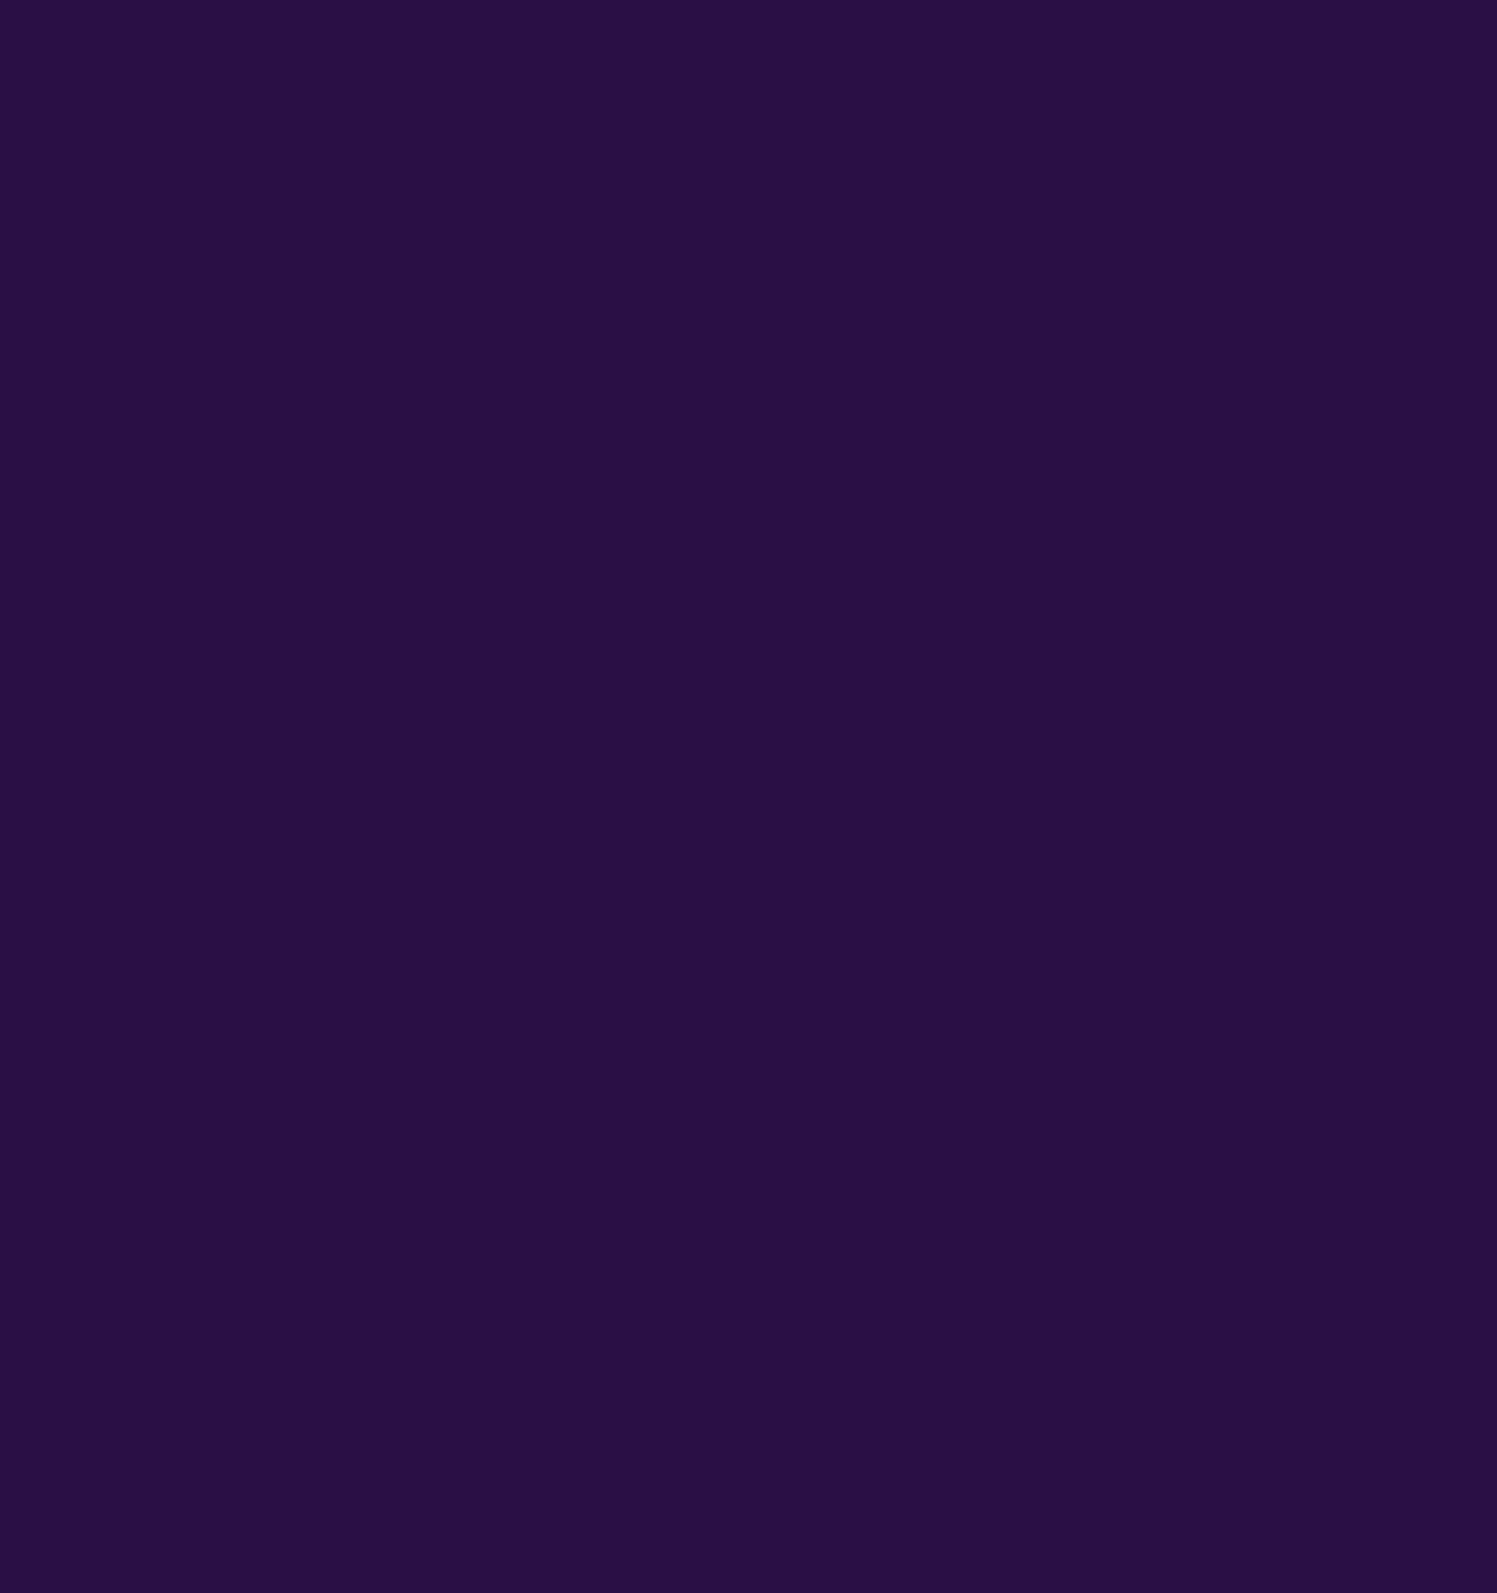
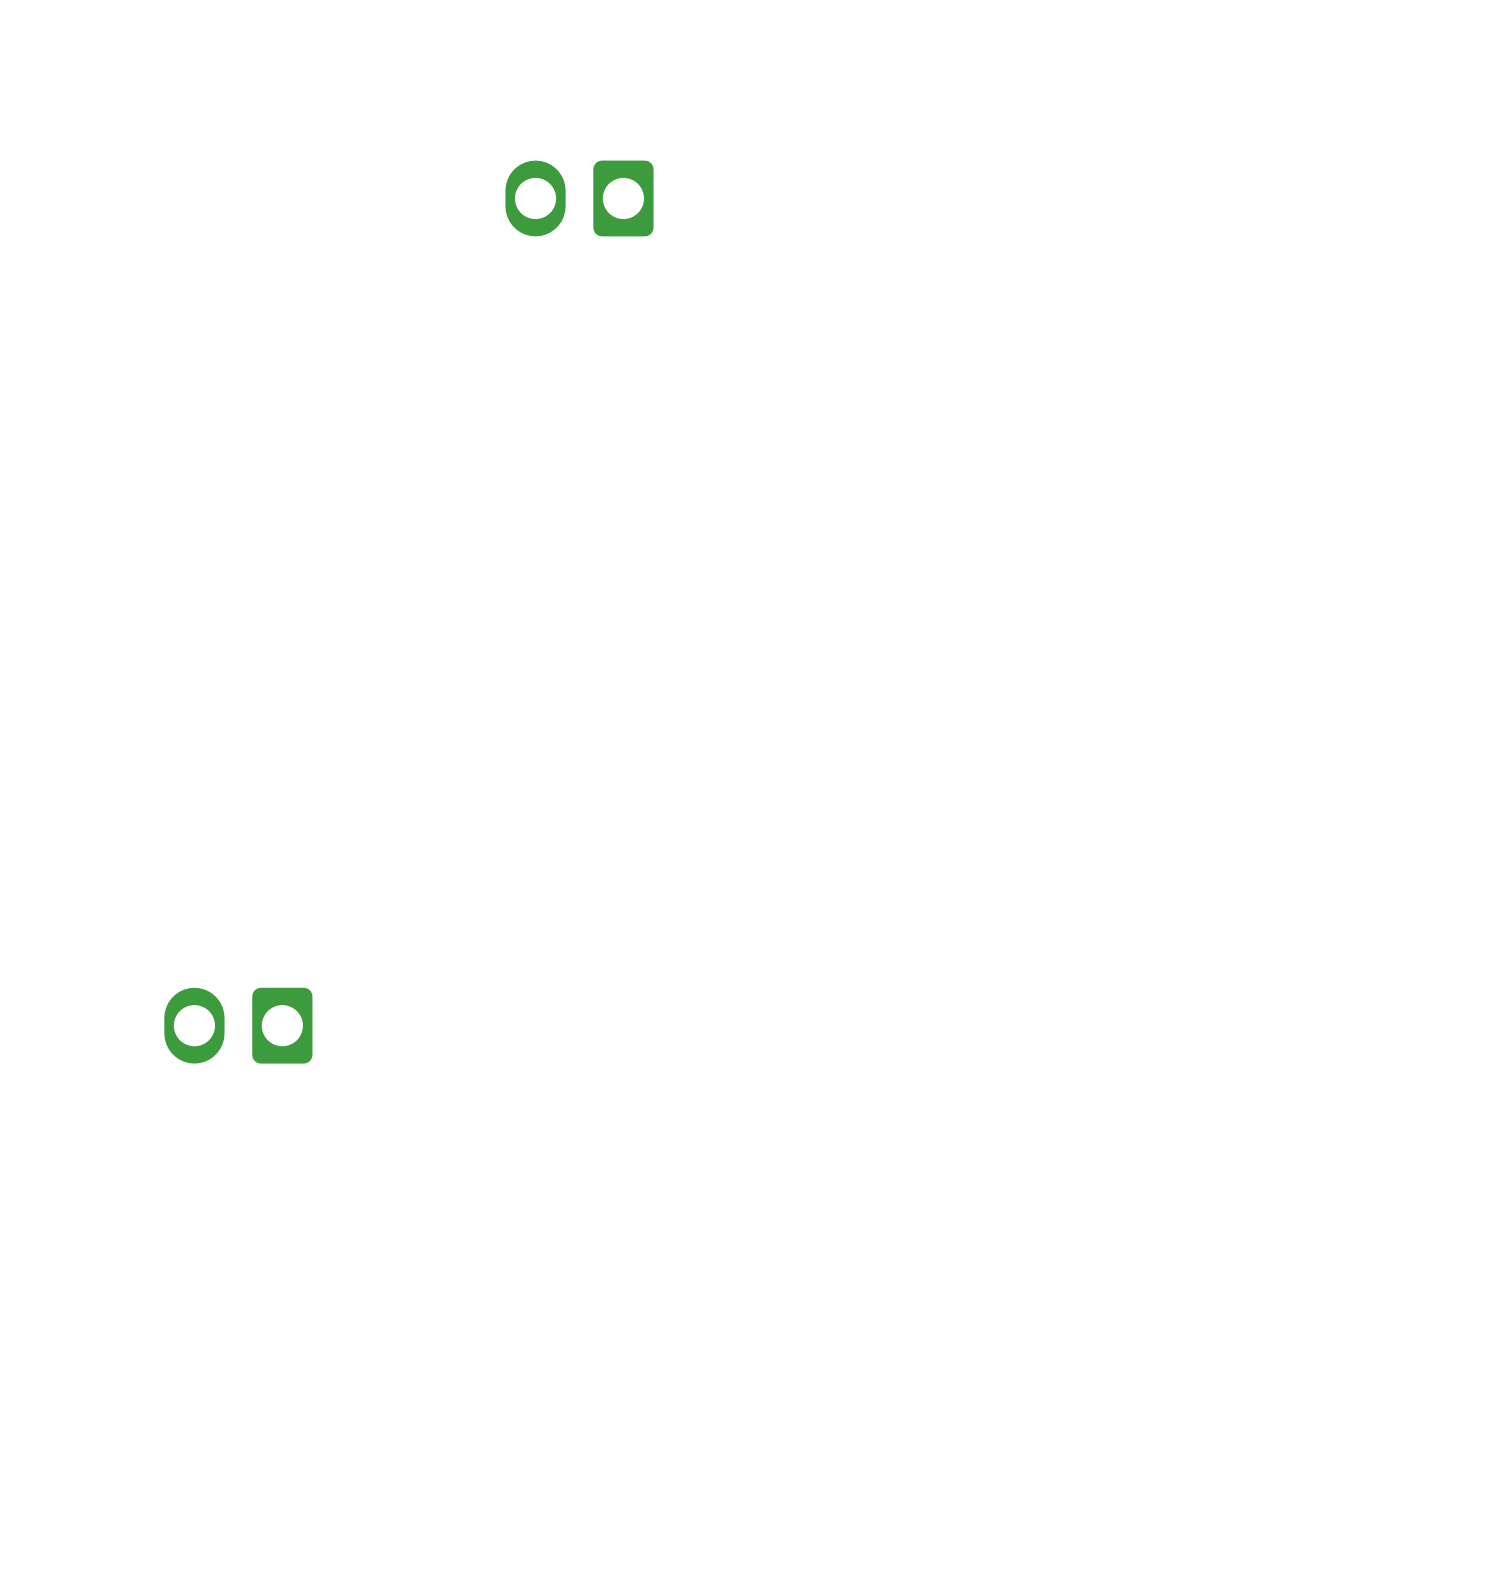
part: none -> (579, 198)
part: none -> (238, 1025)

